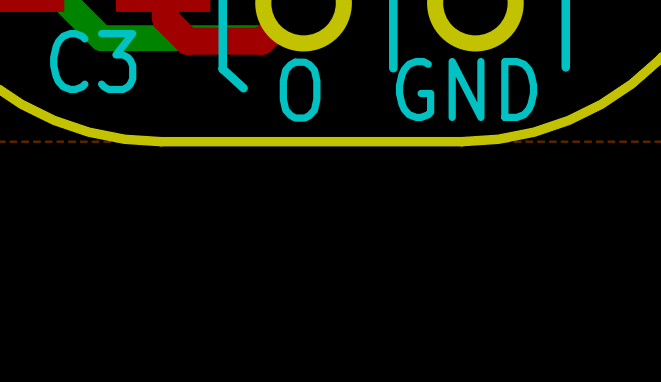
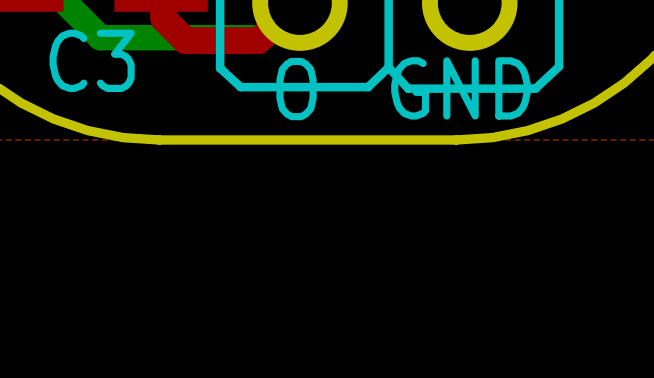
line: none -> (559, 66) (535, 88) (408, 88) (388, 67) (368, 87) (240, 87)

